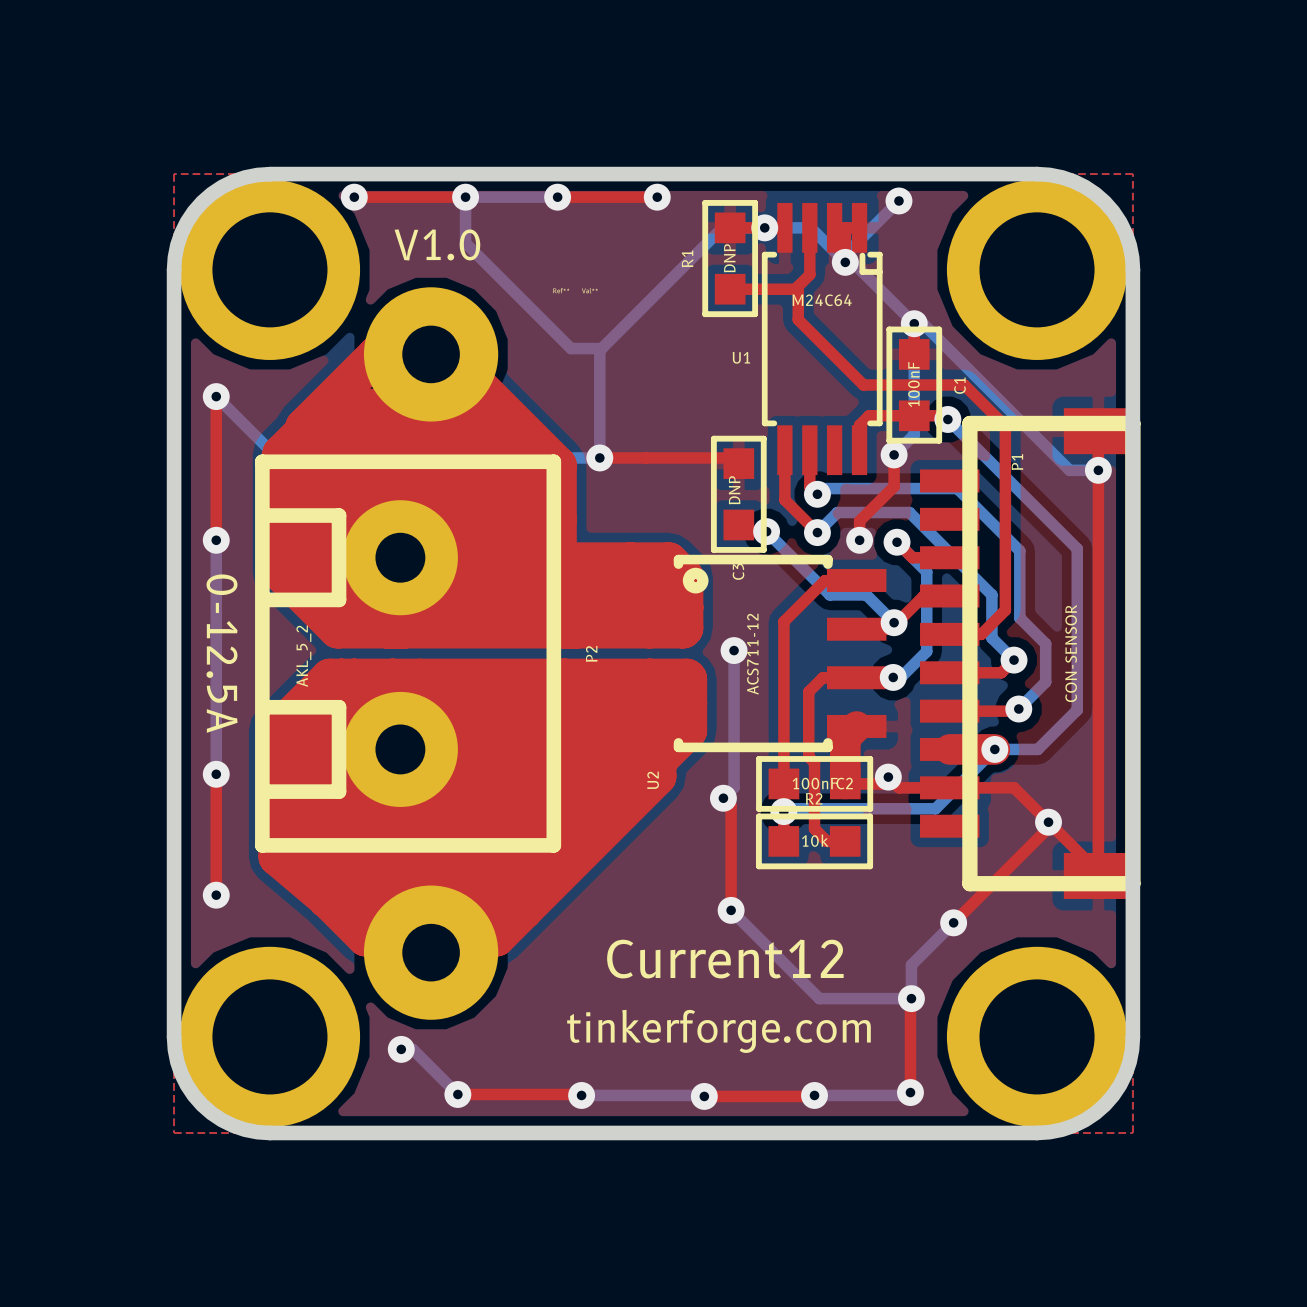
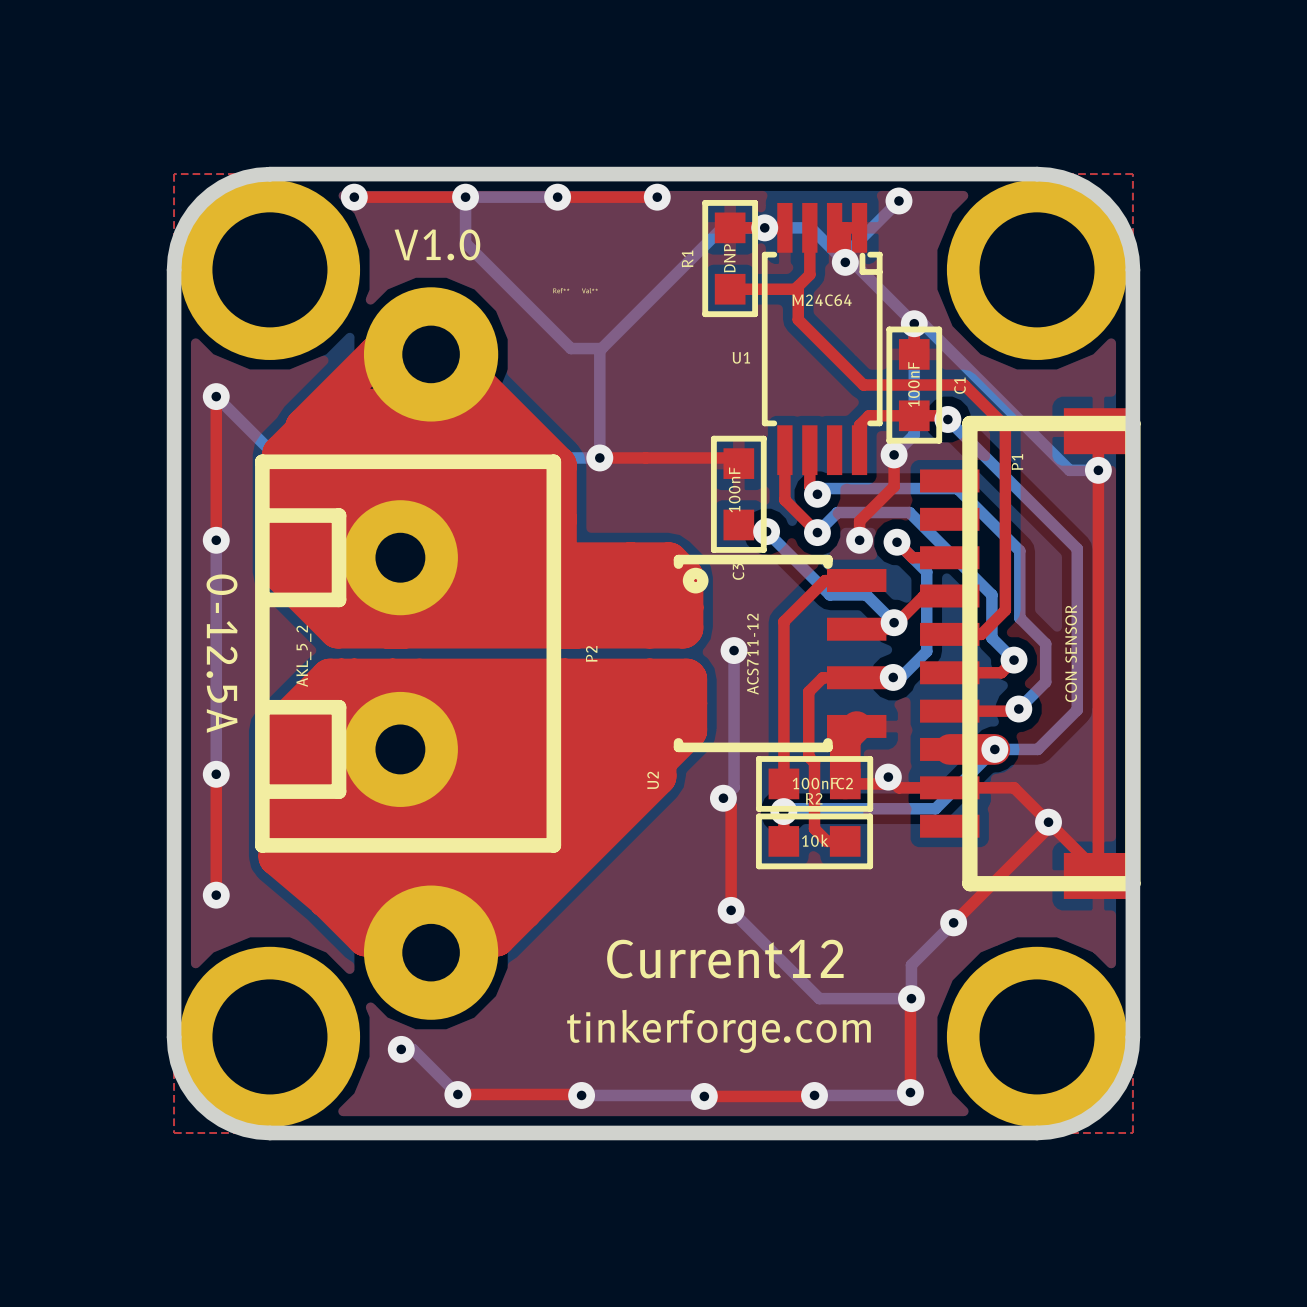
C3 value: DNP (734, 490) -> 100nF (734, 489)

